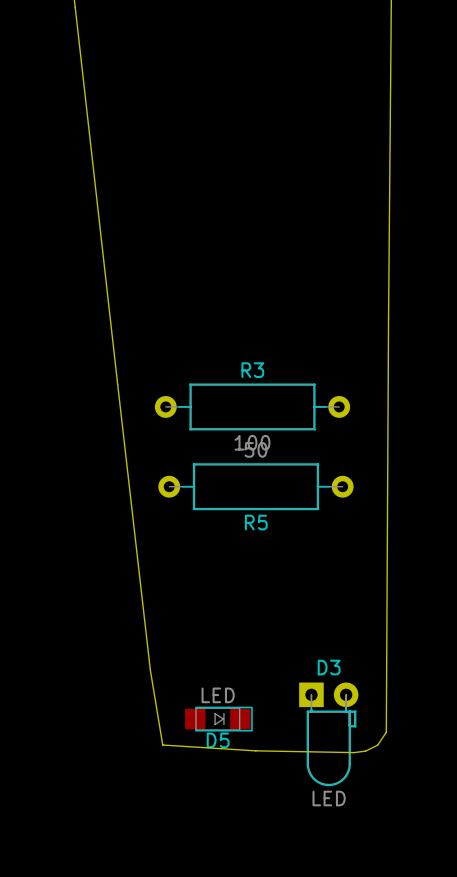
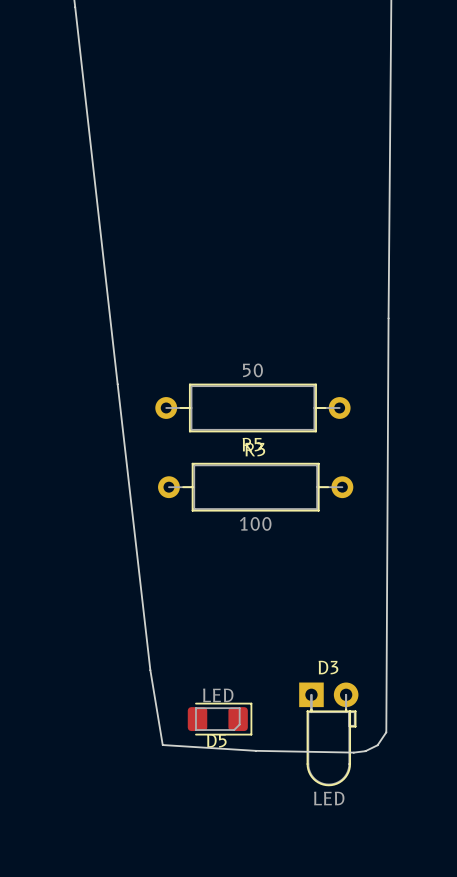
R3 footprint: [154, 383, 351, 431] -> [158, 462, 354, 512]
R5 footprint: [158, 463, 354, 511] -> [155, 383, 351, 433]
D5 footprint: [185, 706, 253, 732] -> [187, 702, 253, 736]

